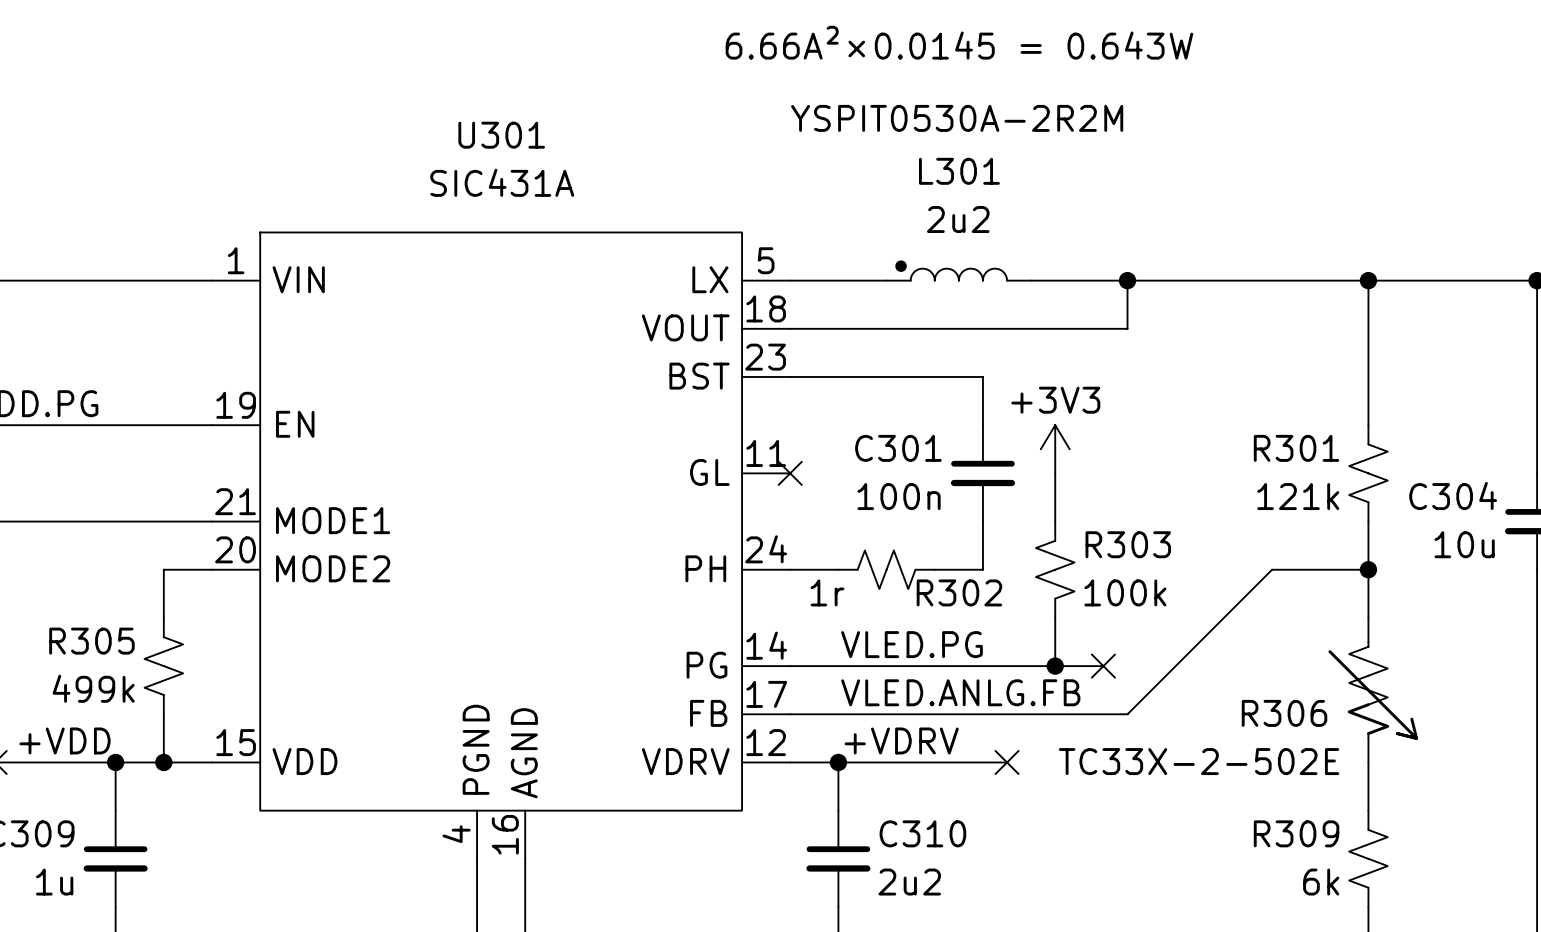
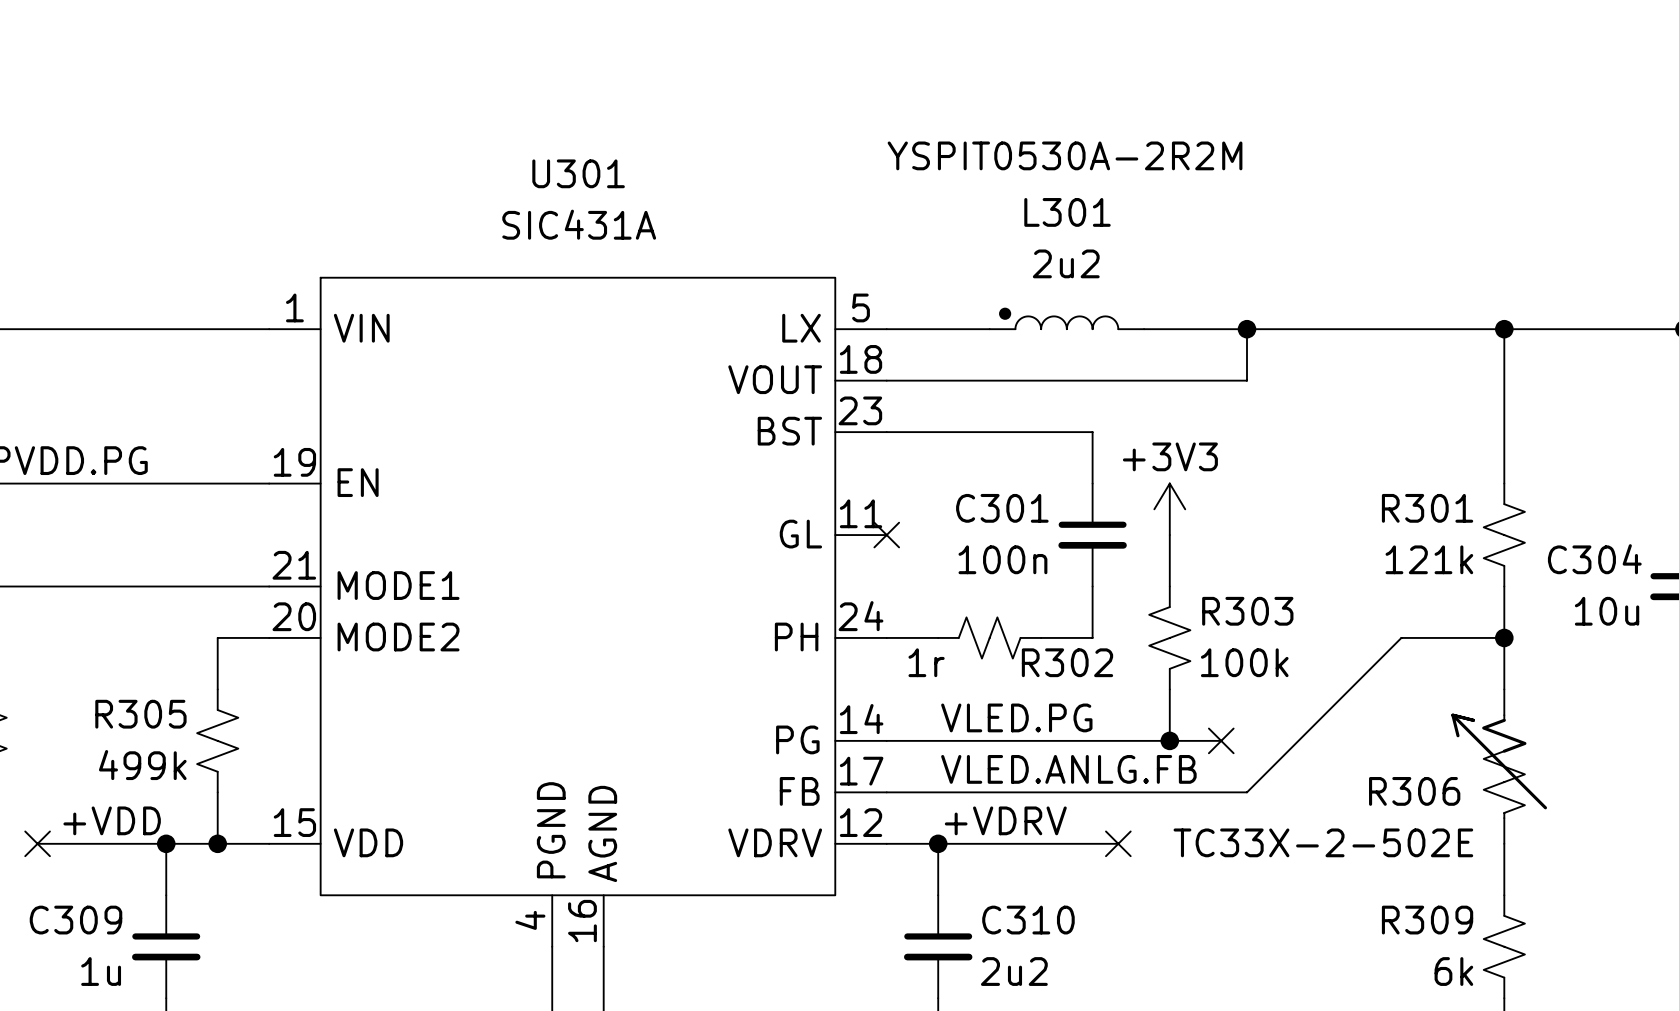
text: 6.66A²×0.0145 = 0.643W (959, 42) -> none
R306 rotation: 0° (1373, 690) -> 180° (1499, 765)

